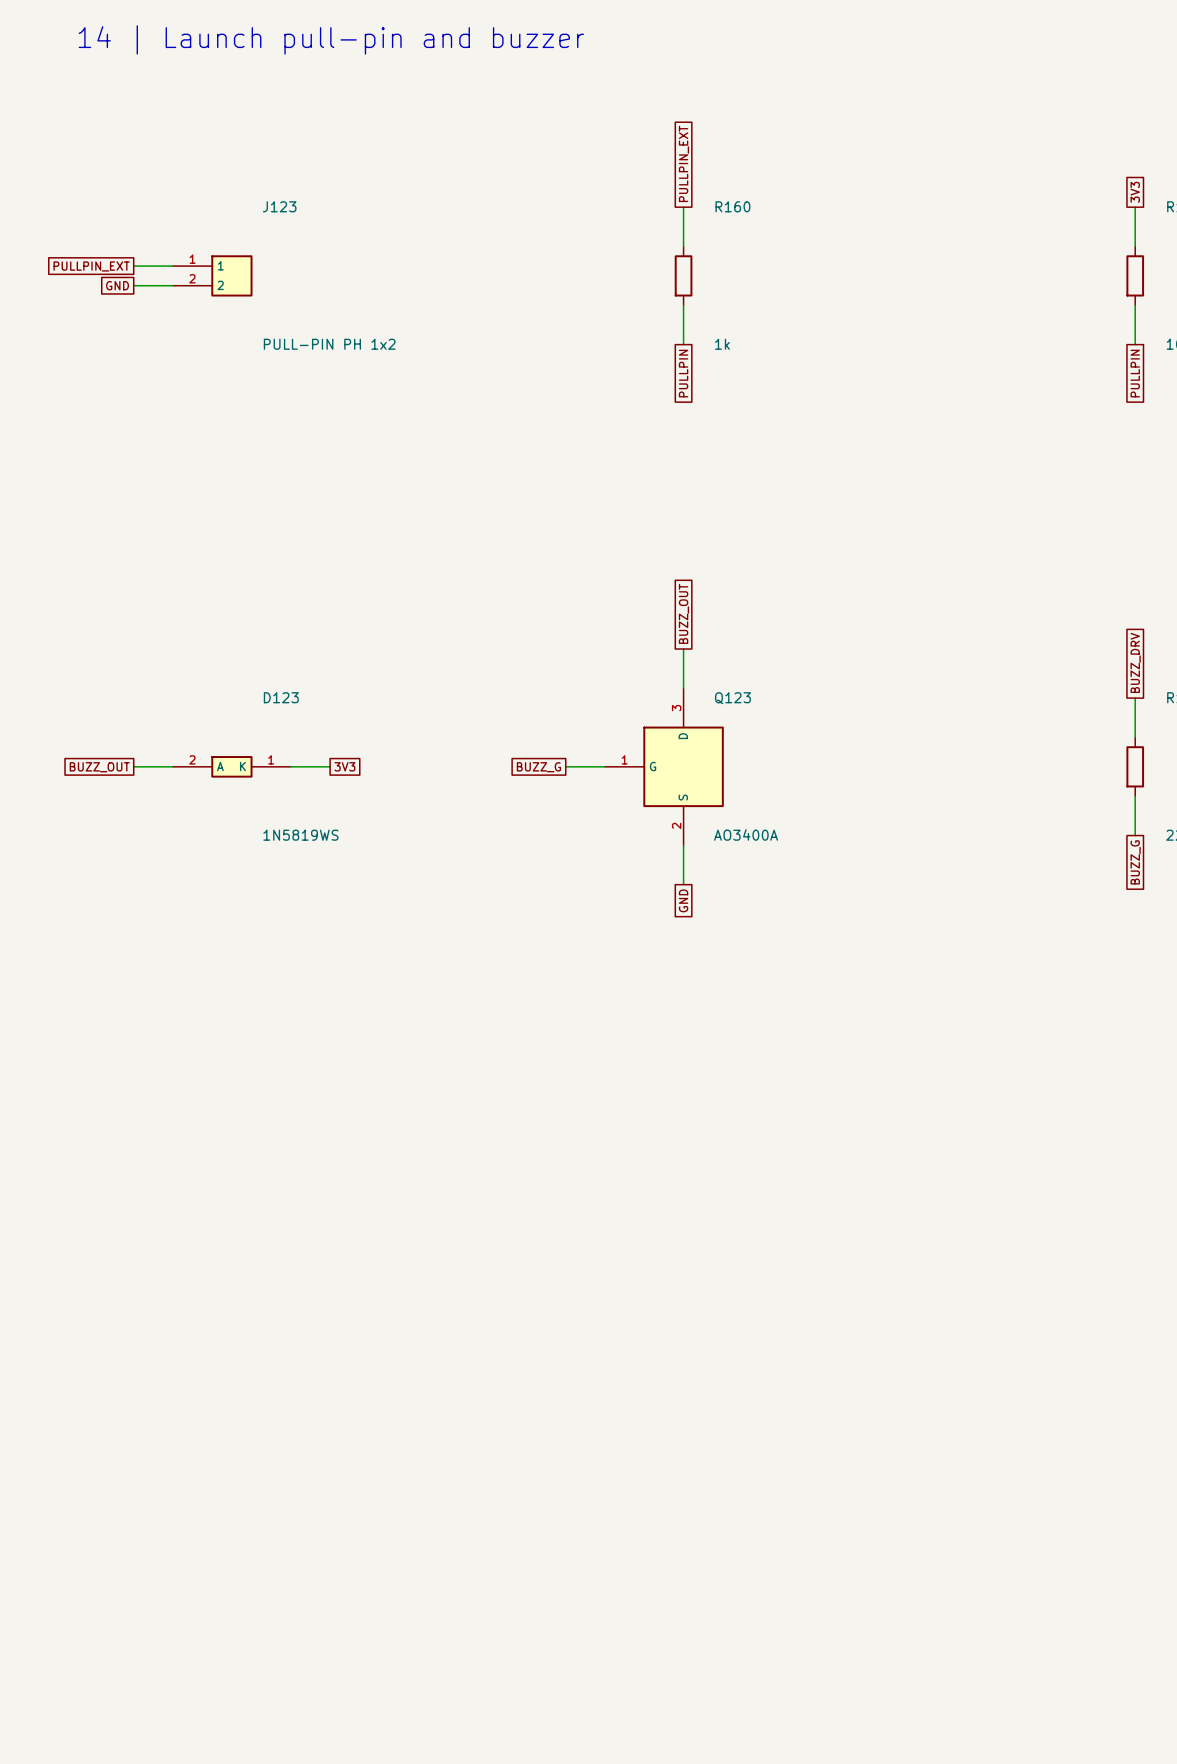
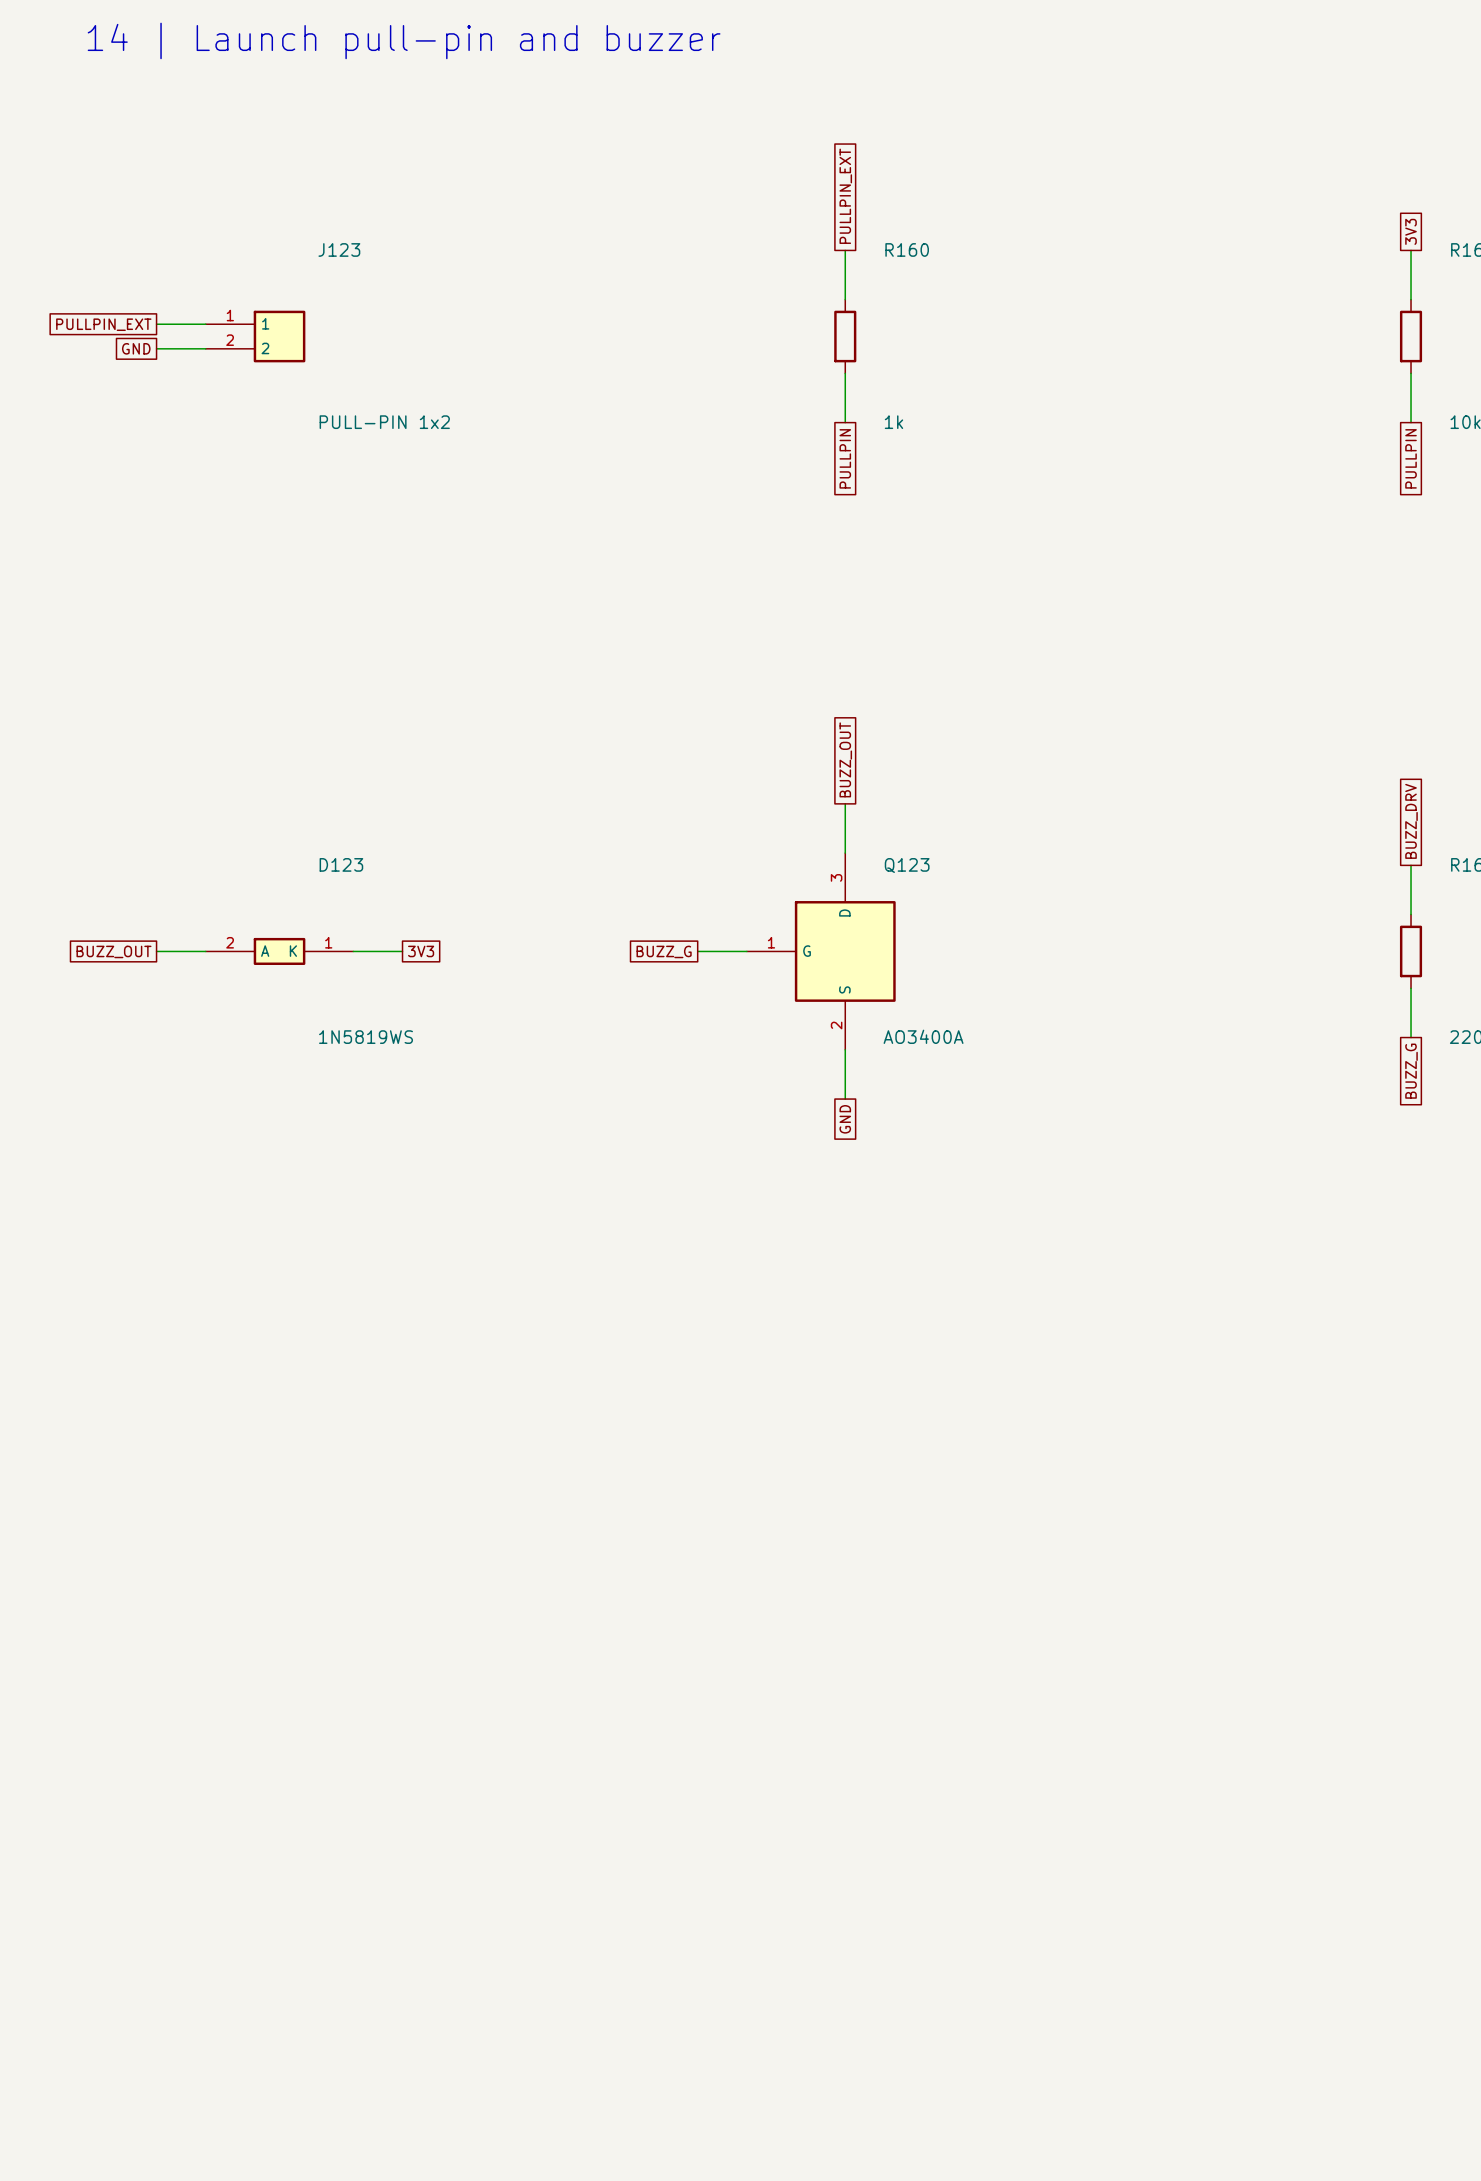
J123 value: PULL-PIN PH 1x2 (329, 344) -> PULL-PIN 1x2 (384, 422)

